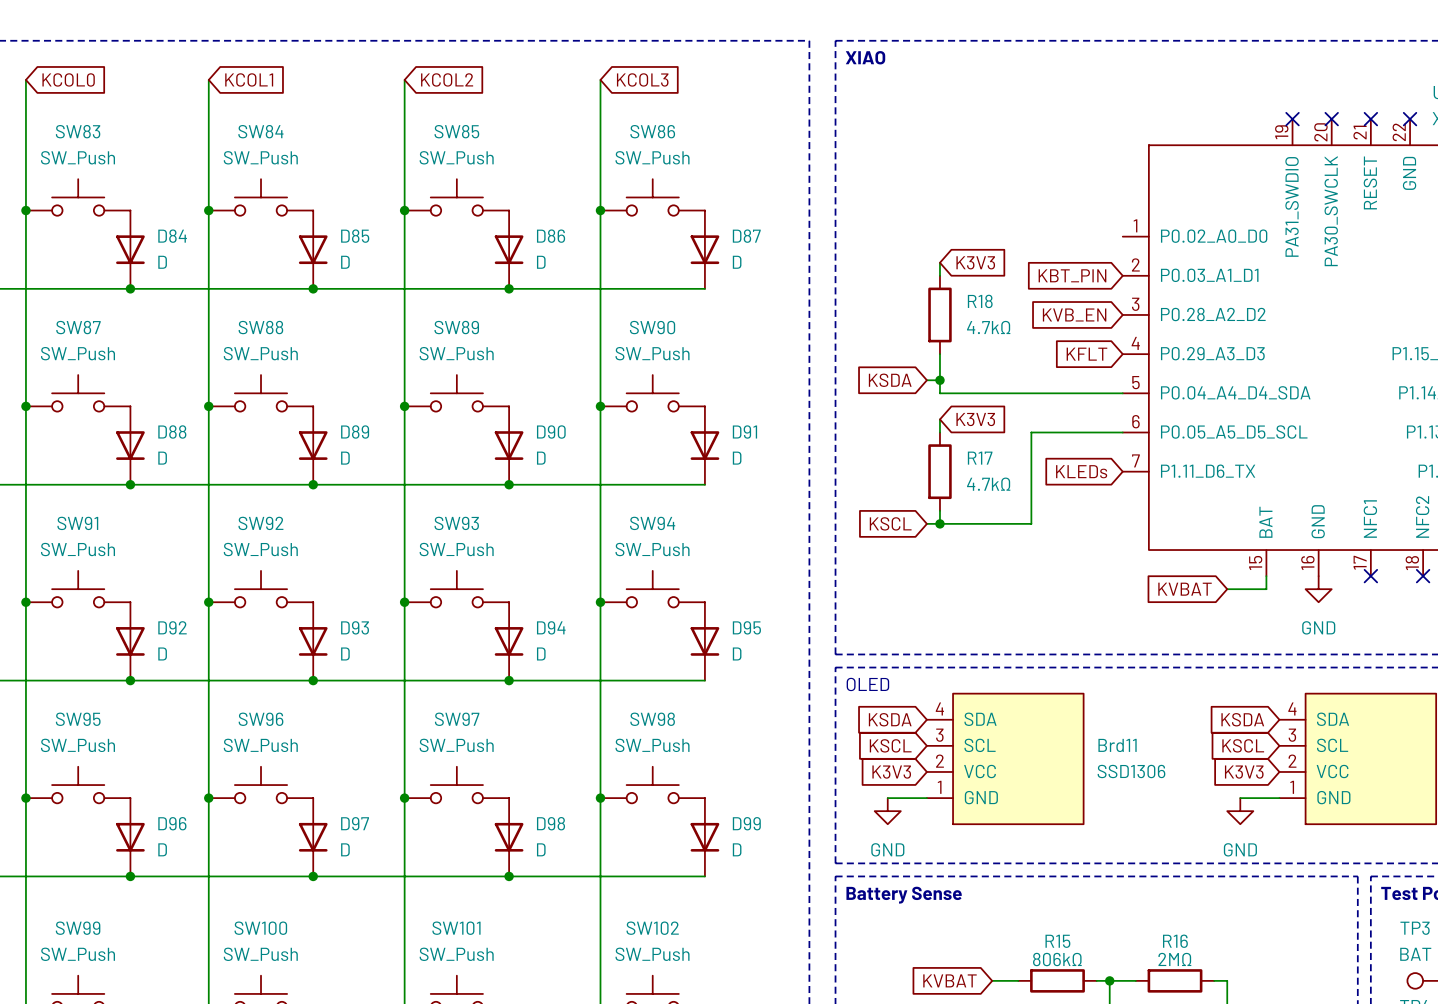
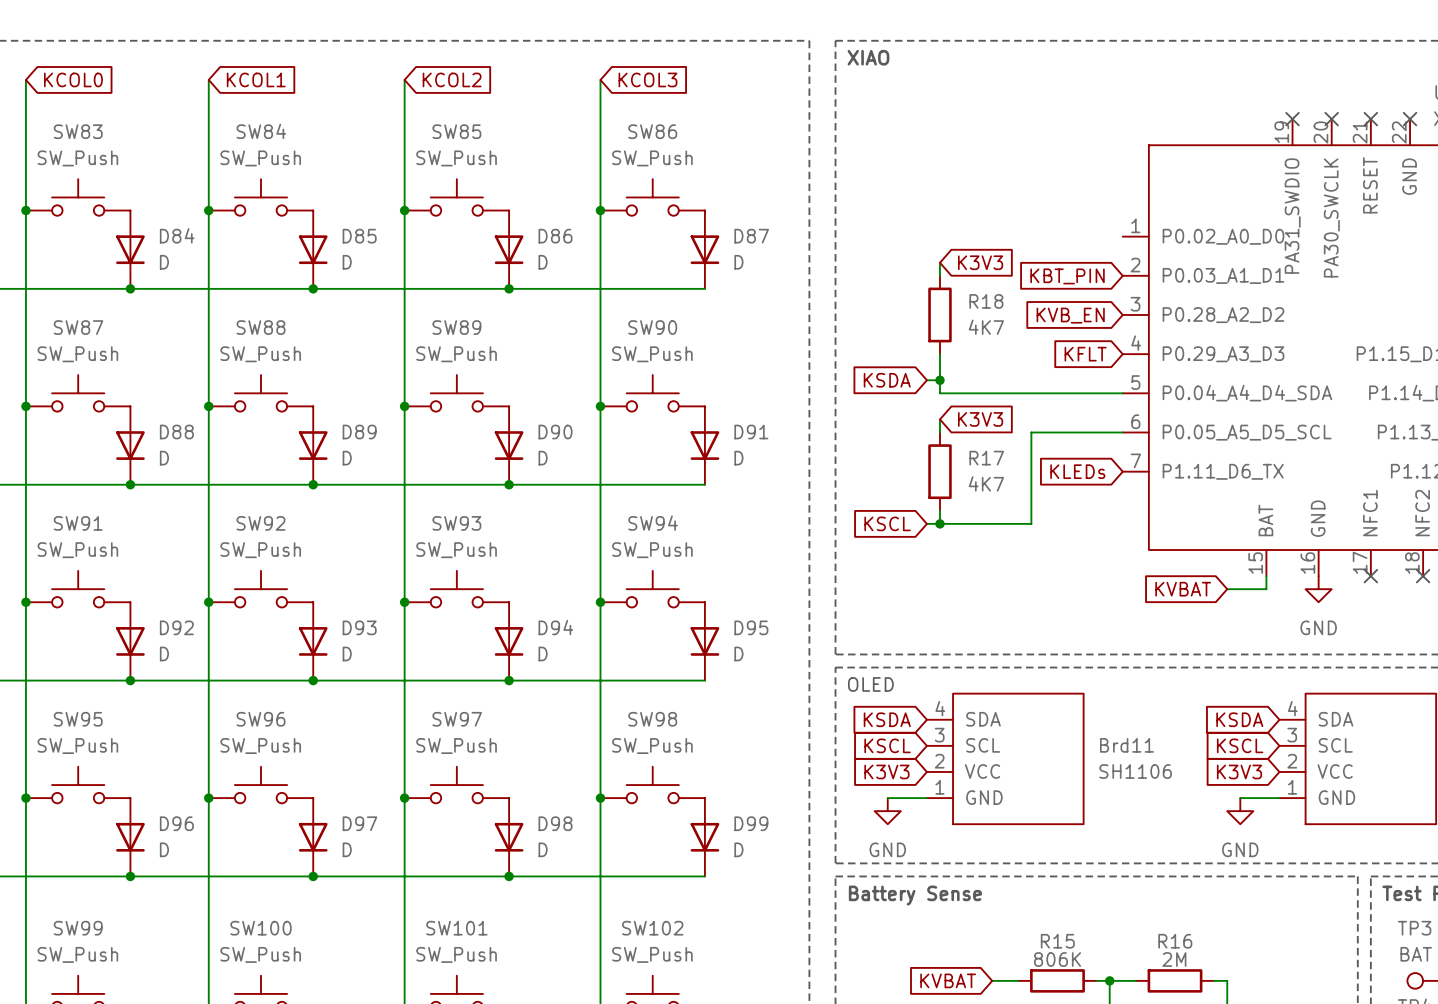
R18 value: 4.7kΩ (988, 327) -> 4K7 (986, 327)
R17 value: 4.7kΩ (988, 484) -> 4K7 (986, 483)
Brd11 value: SSD1306 (1131, 771) -> SH1106 (1135, 771)
R15 value: 806kΩ (1057, 959) -> 806K (1057, 959)
R16 value: 2MΩ (1174, 959) -> 2M (1174, 959)

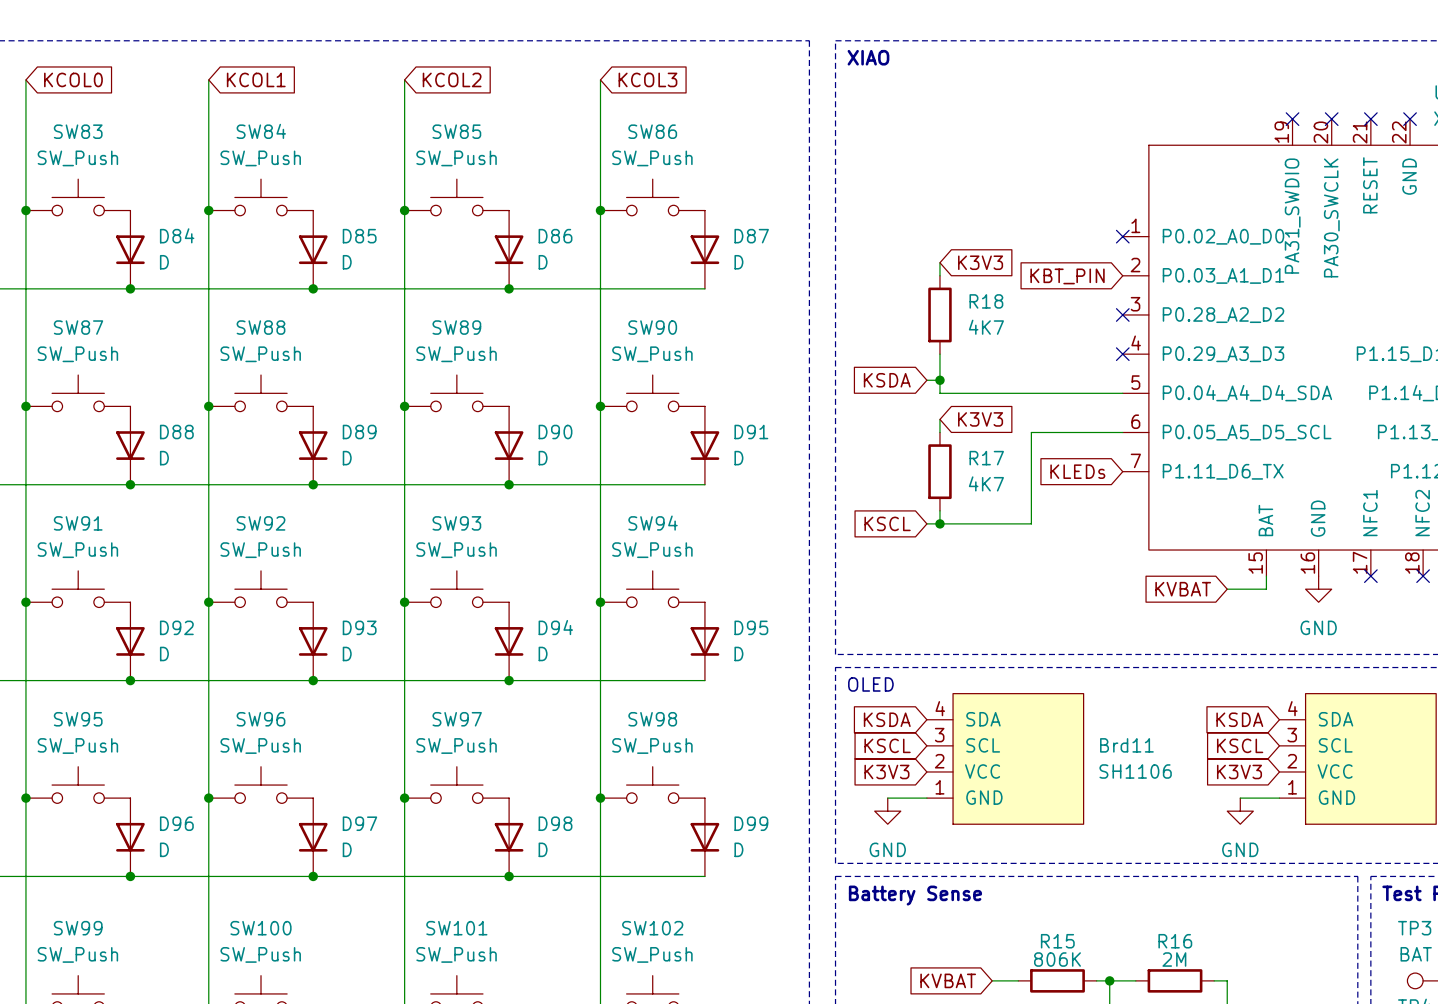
no-connect mark: none -> (1122, 236)
no-connect mark: none -> (1122, 314)
global label: KVB_EN (1070, 315) -> none
global label: KFLT (1085, 354) -> none
no-connect mark: none -> (1122, 354)

